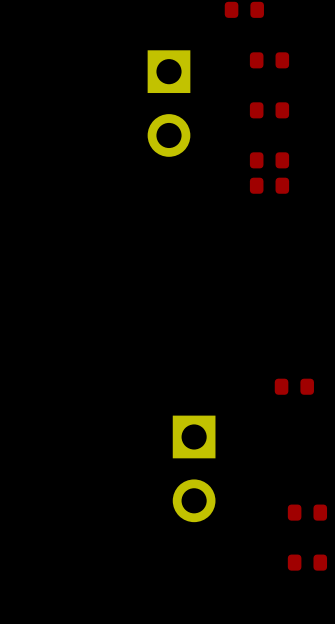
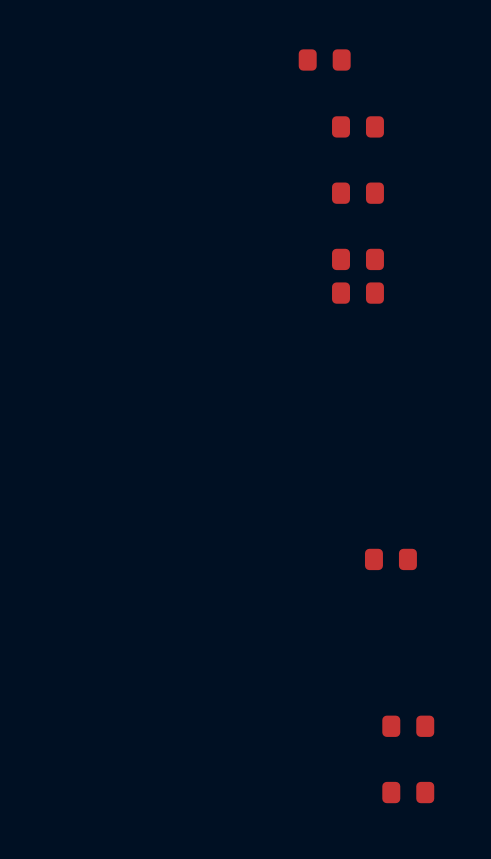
part: (168, 103) -> none
part: (194, 468) -> none

